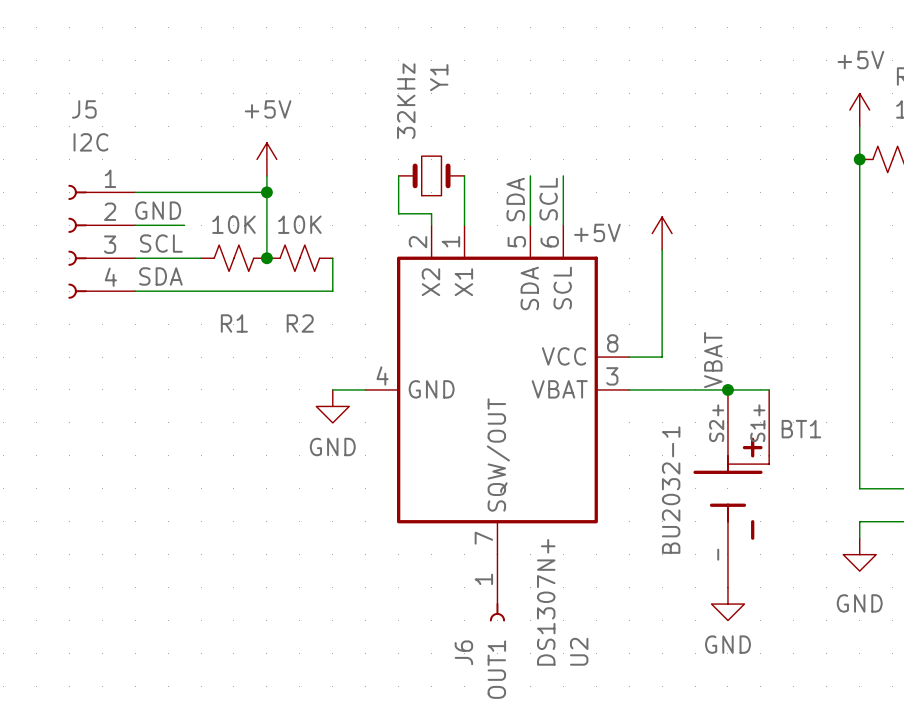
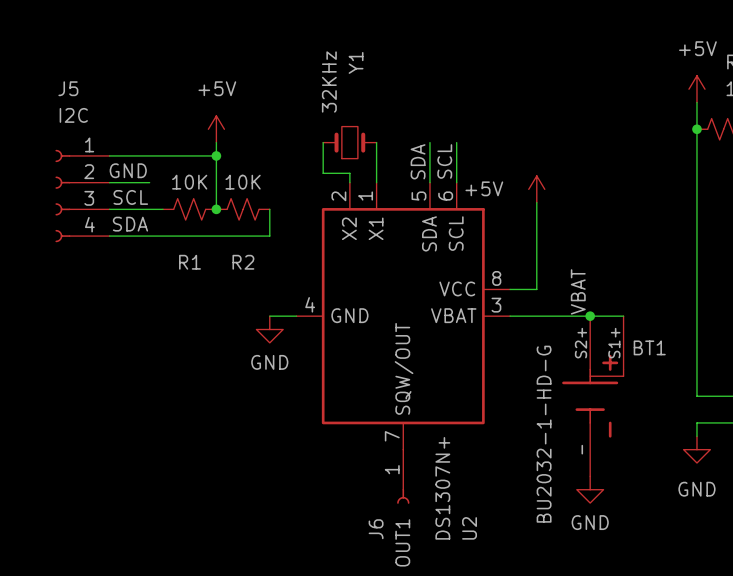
BT1 value: BU2032-1 (671, 490) -> BU2032-1-HD-G (544, 434)

